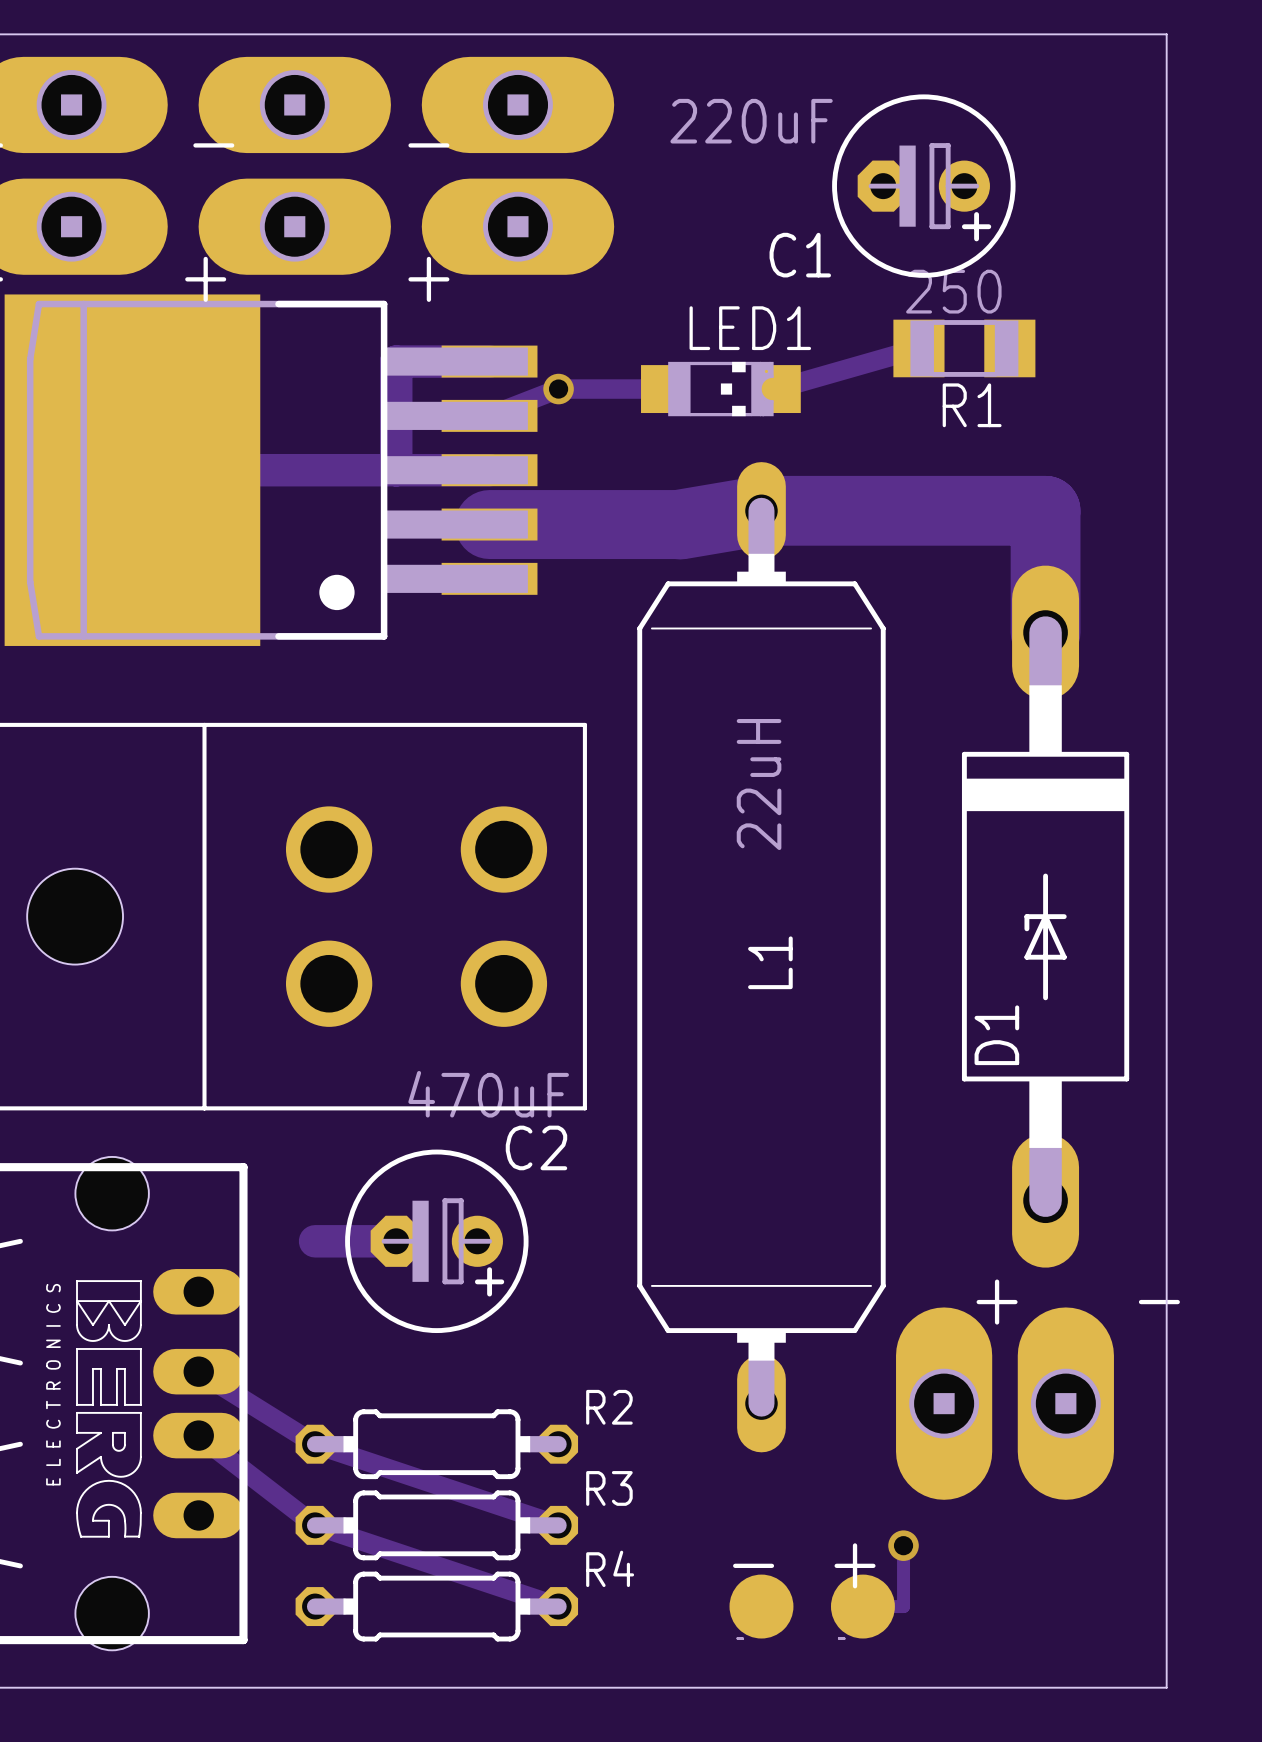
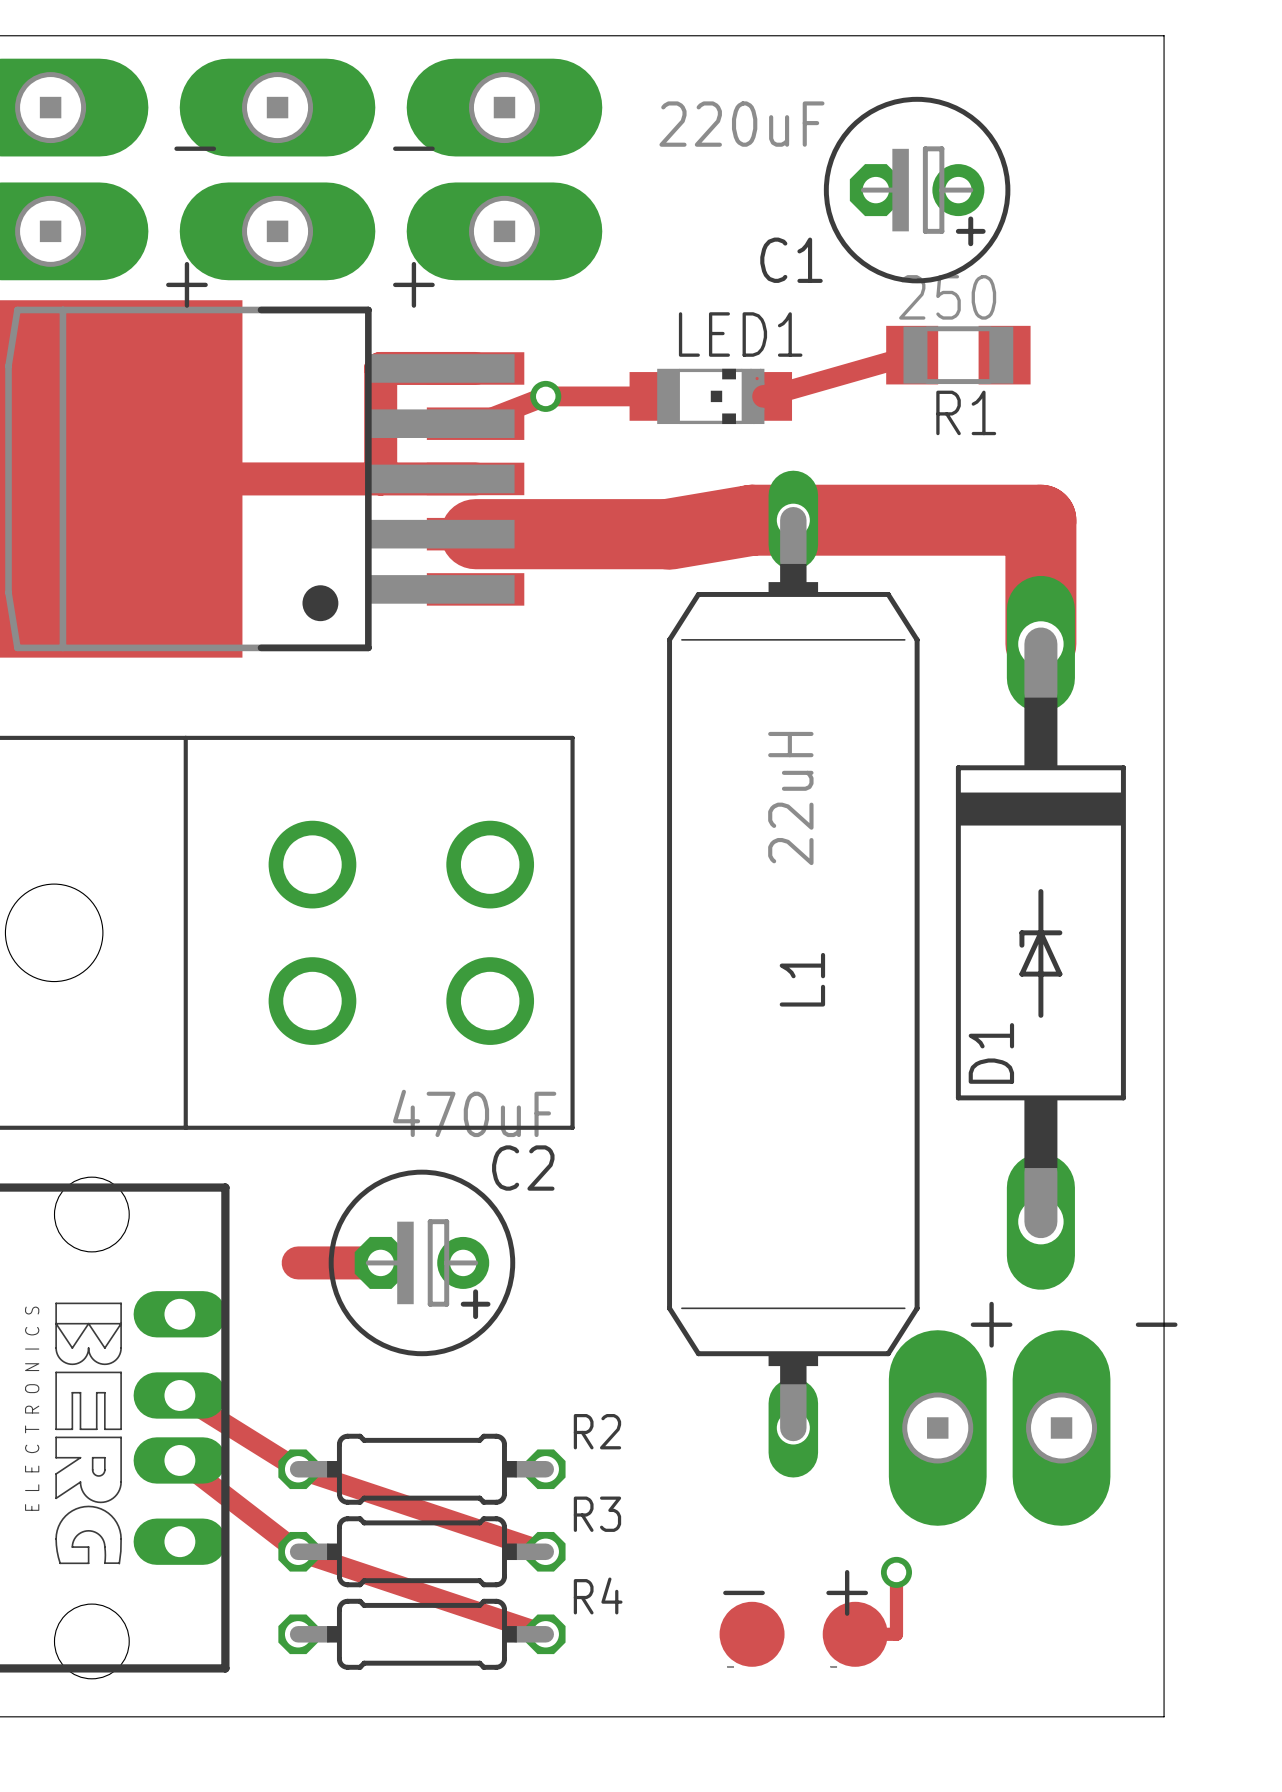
L1 position: (761, 957) -> (793, 974)

